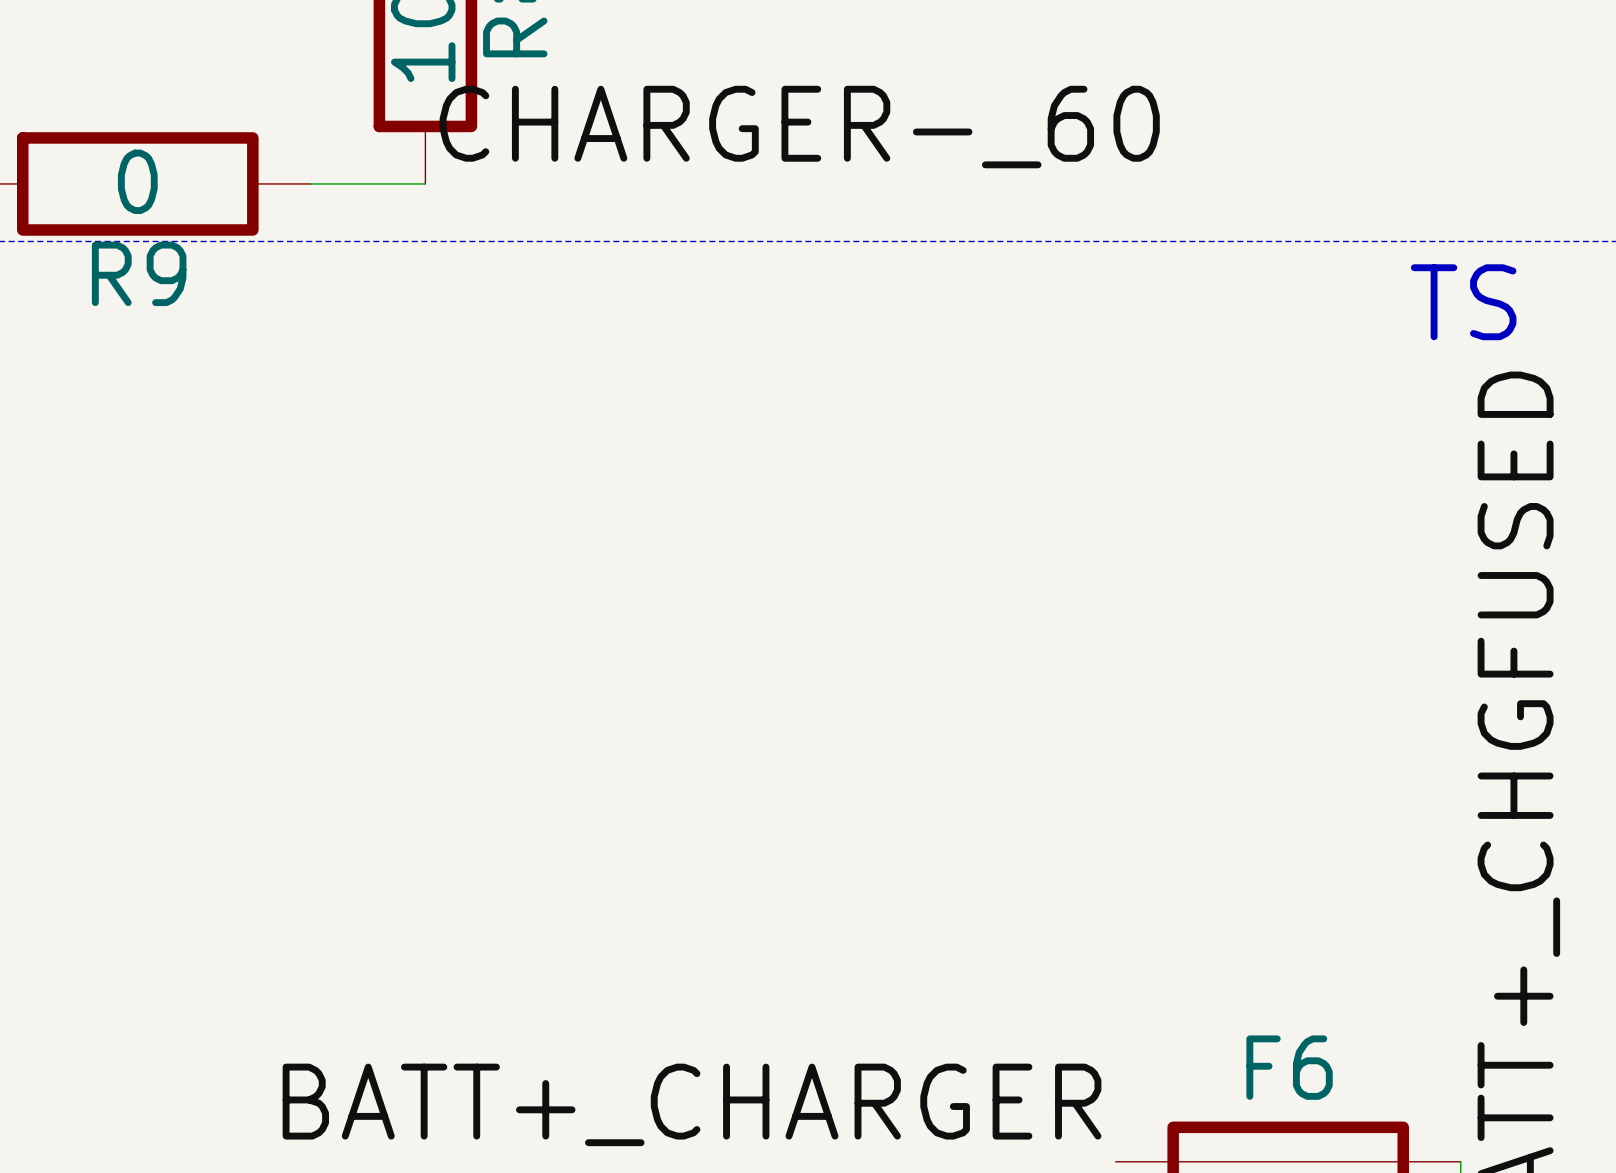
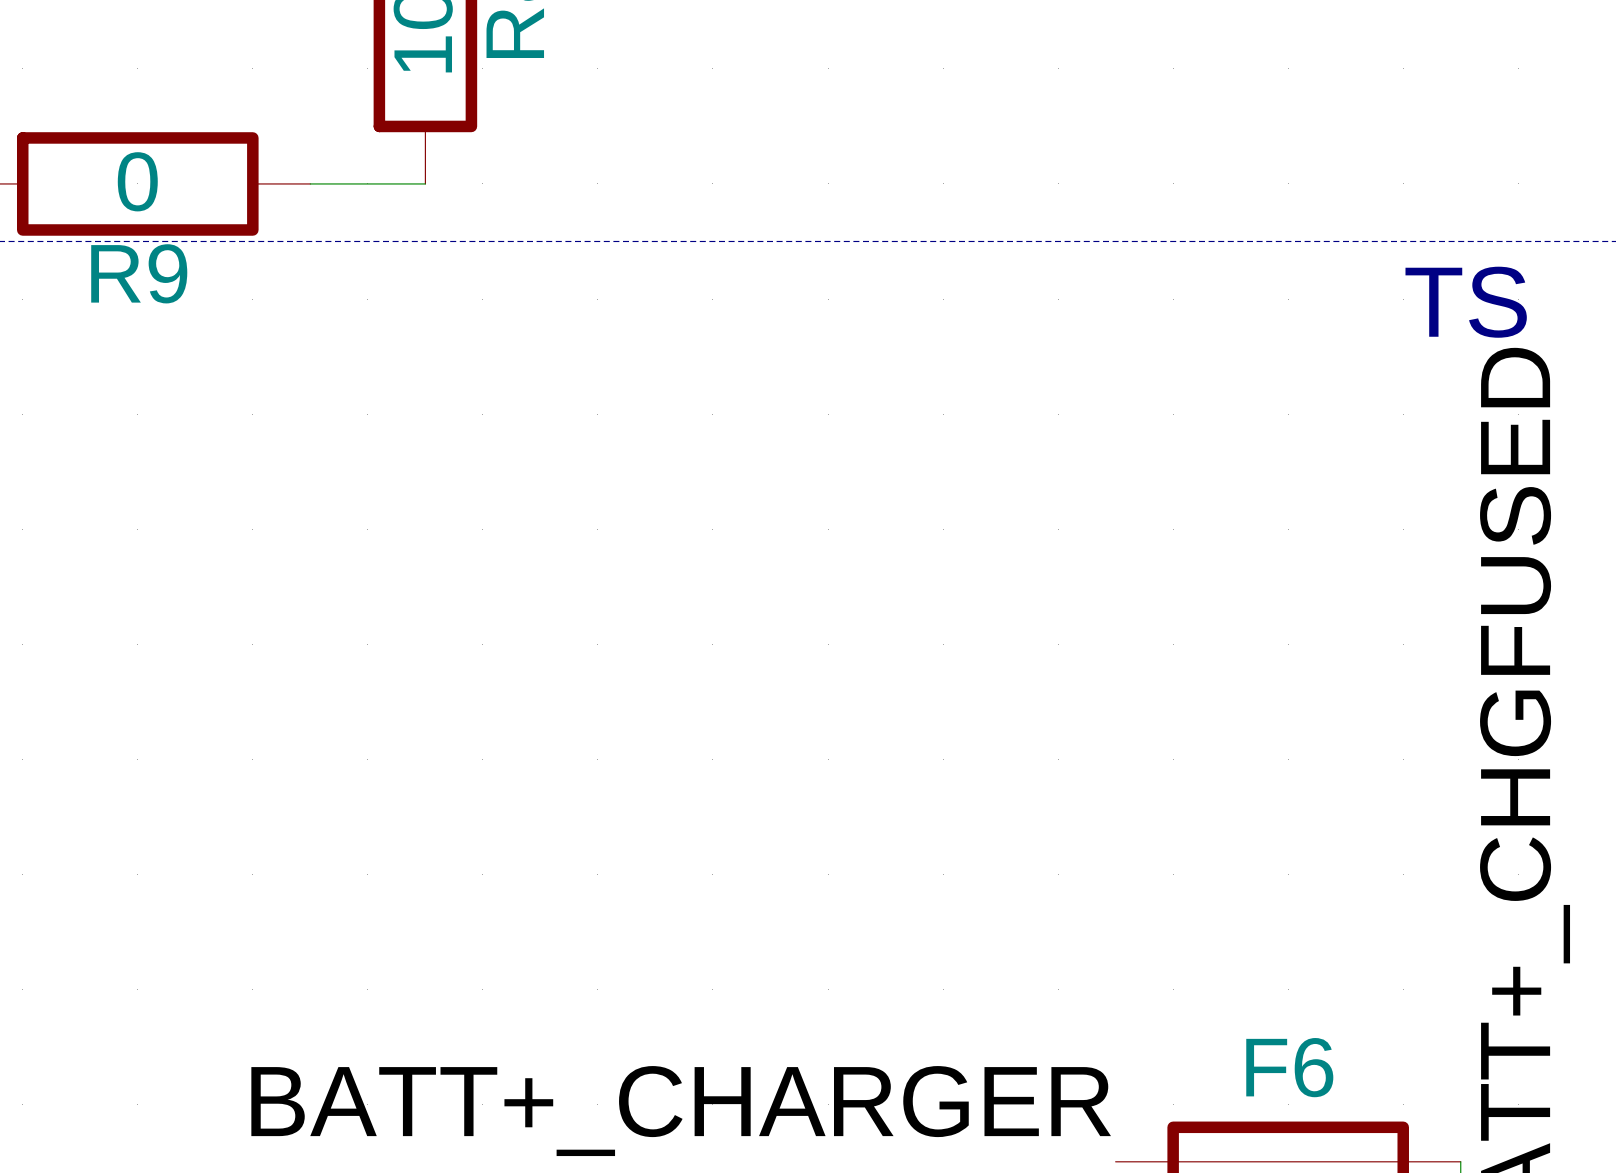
label: CHARGER-_60 (799, 127) -> none

